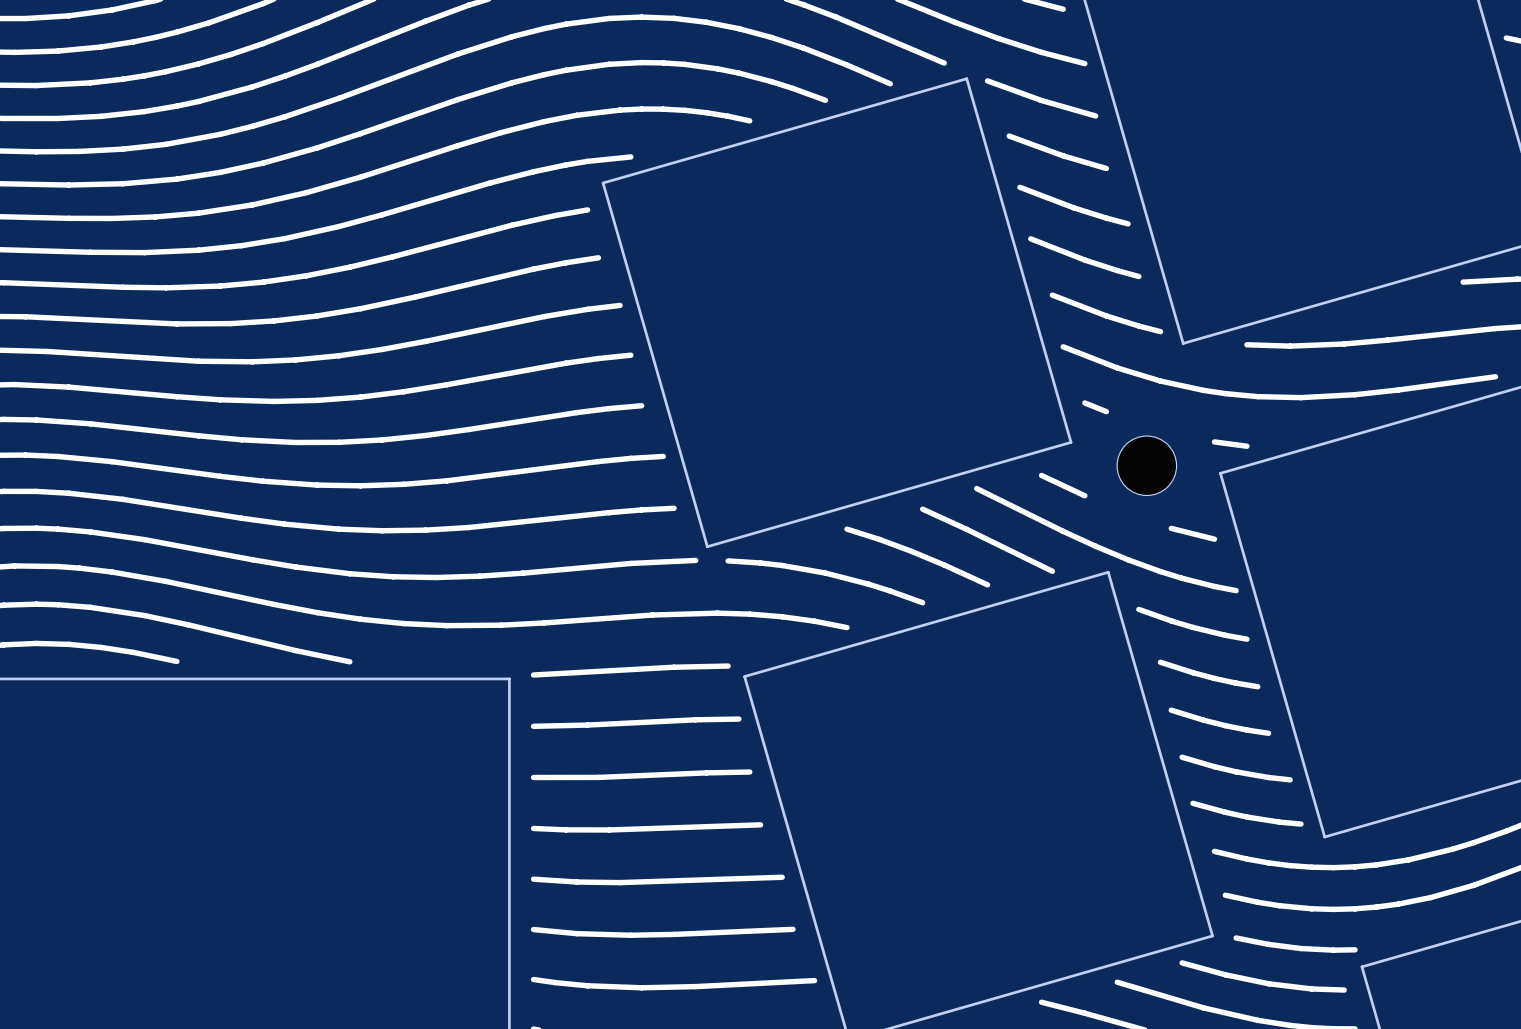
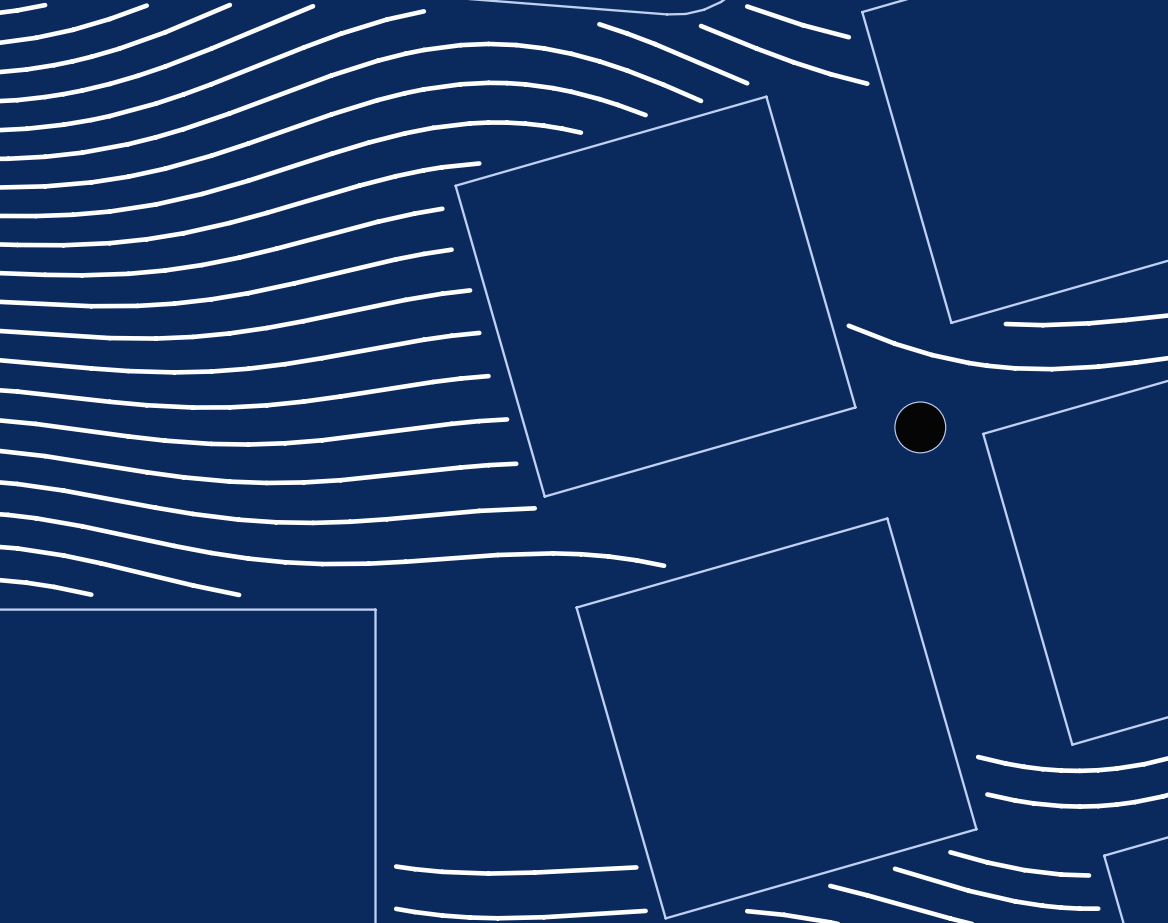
line: (987, 80) (1041, 100) (1095, 115) -> none
line: (1009, 136) (1063, 155) (1106, 168) -> none
line: (1019, 187) (1074, 207) (1128, 223) -> none
line: (1030, 238) (1084, 260) (1138, 276) -> none
line: (1052, 295) (1106, 315) (1160, 331) -> none
line: (1084, 402) (1106, 411) -> none
line: (1214, 441) (1246, 446) -> none
line: (1041, 475) (1084, 495) -> none
line: (976, 488) (1063, 531) (1128, 559) (1182, 578) (1236, 590) -> none
line: (922, 509) (1052, 571) -> none
line: (1171, 528) (1214, 539) -> none
line: (847, 529) (911, 551) (987, 584) -> none
line: (728, 560) (782, 565) (825, 573) (868, 584) (922, 602) -> none
line: (1138, 609) (1192, 627) (1246, 639) -> none
line: (1160, 662) (1214, 678) (1257, 686) -> none
line: (728, 666) (533, 674) -> none
line: (1171, 710) (1225, 725) (1268, 733) -> none
line: (738, 719) (533, 726) -> none
line: (1182, 757) (1236, 771) (1290, 779) -> none
line: (749, 772) (598, 777) (533, 777) -> none
line: (1192, 803) (1246, 817) (1300, 824) -> none
line: (760, 824) (609, 829) (533, 828) -> none
line: (782, 877) (620, 882) (533, 879) -> none
line: (792, 929) (630, 935) (576, 933) (533, 929) -> none
line: (1236, 937) (1300, 948) (1355, 949) -> none

